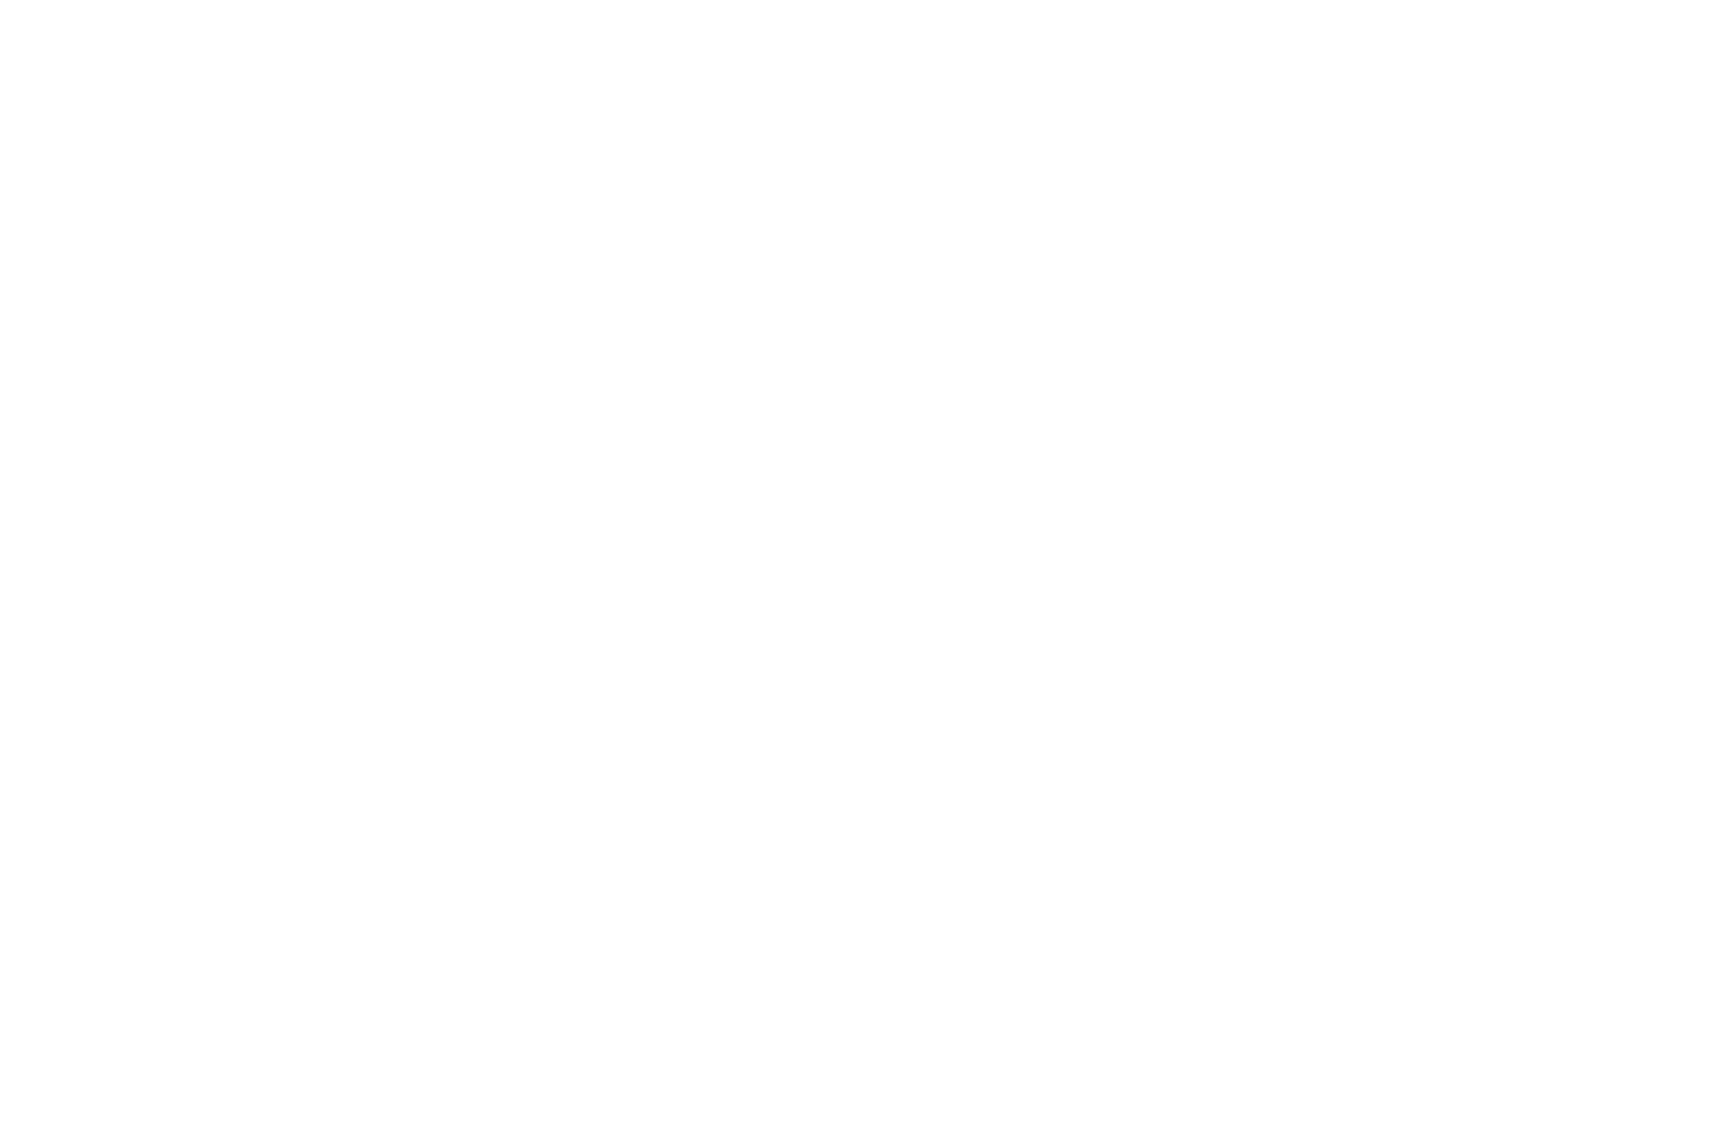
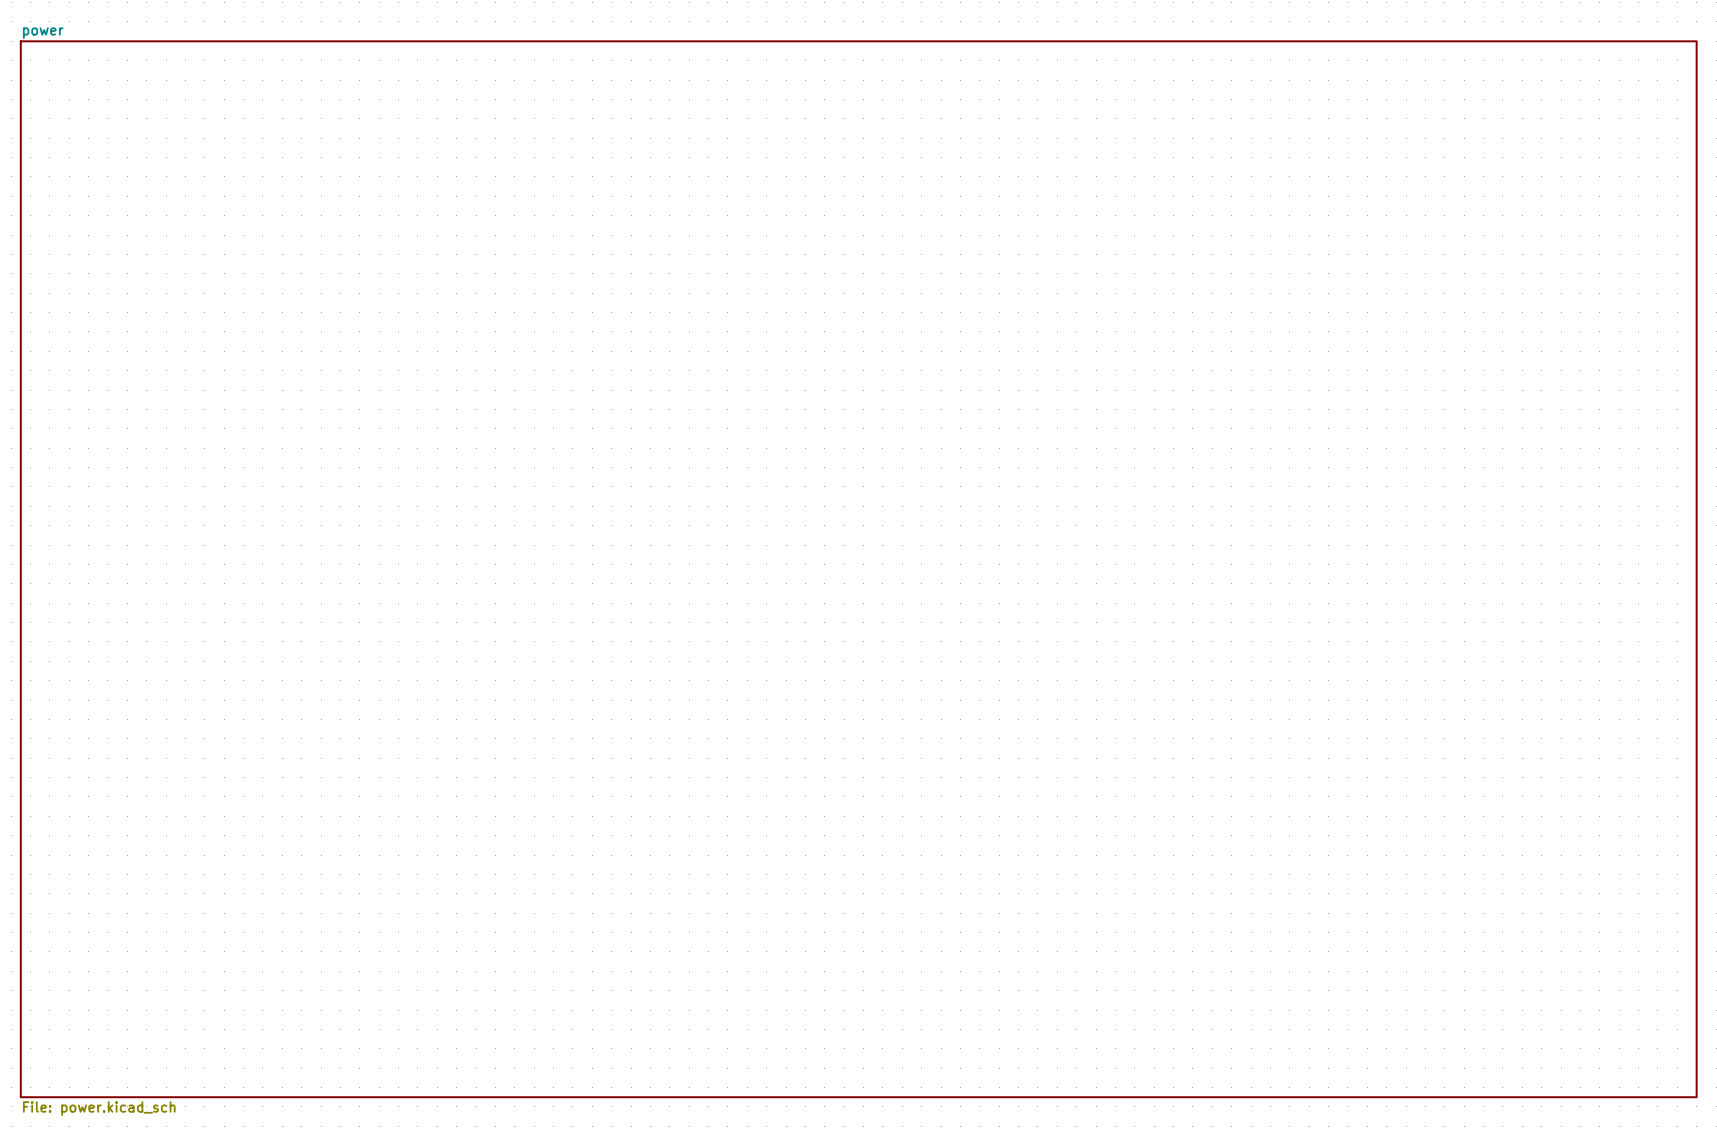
sheet power: none -> File: power.kicad_sch (858, 569)

